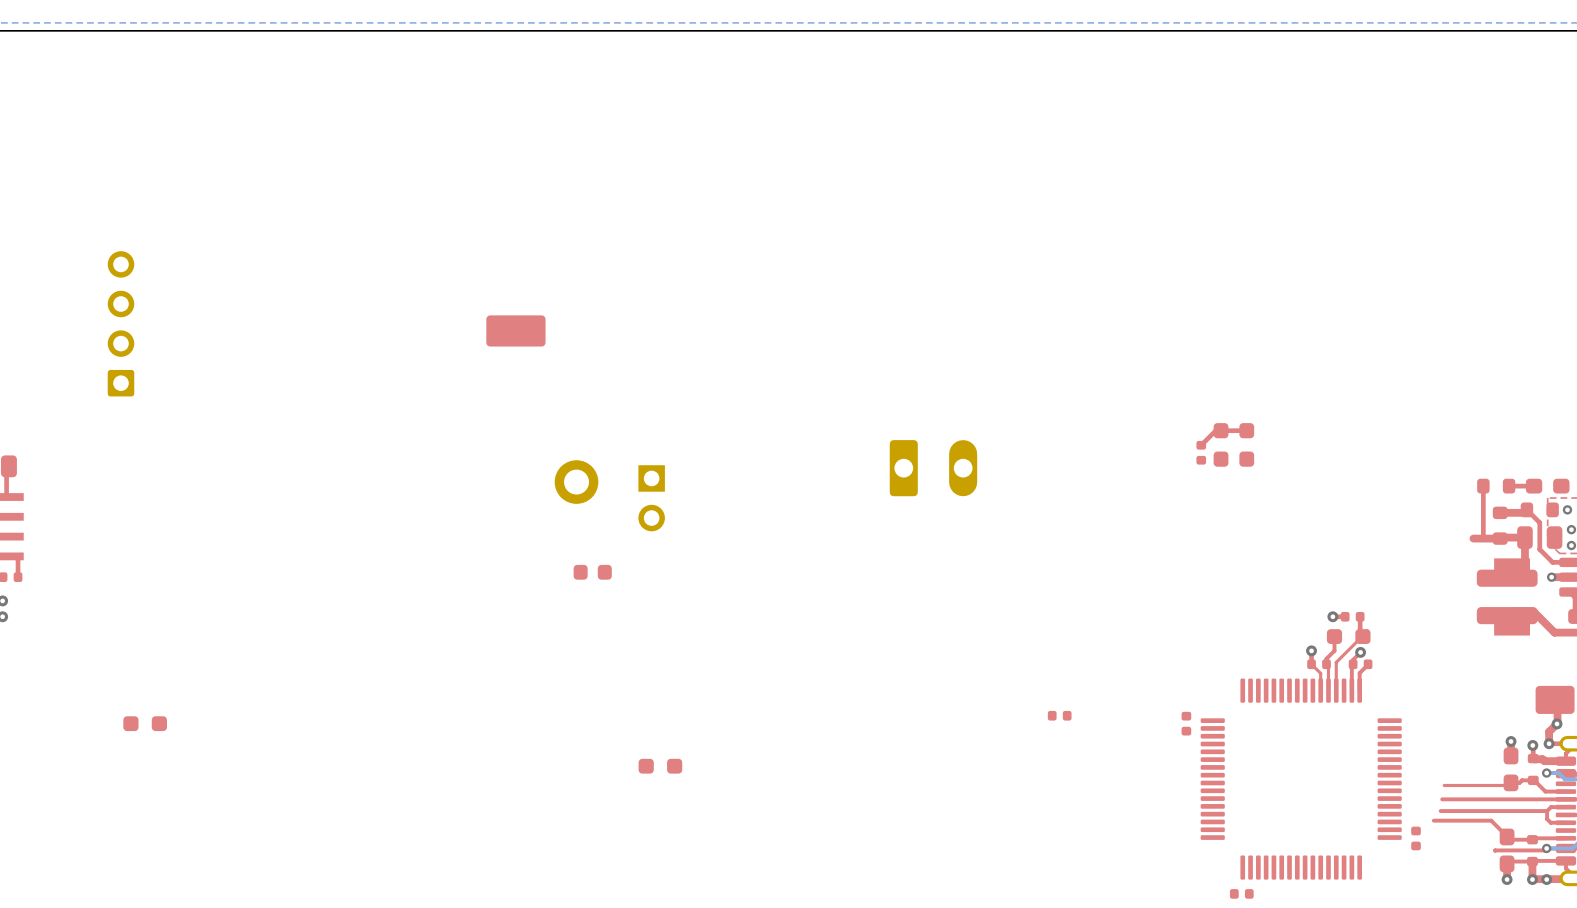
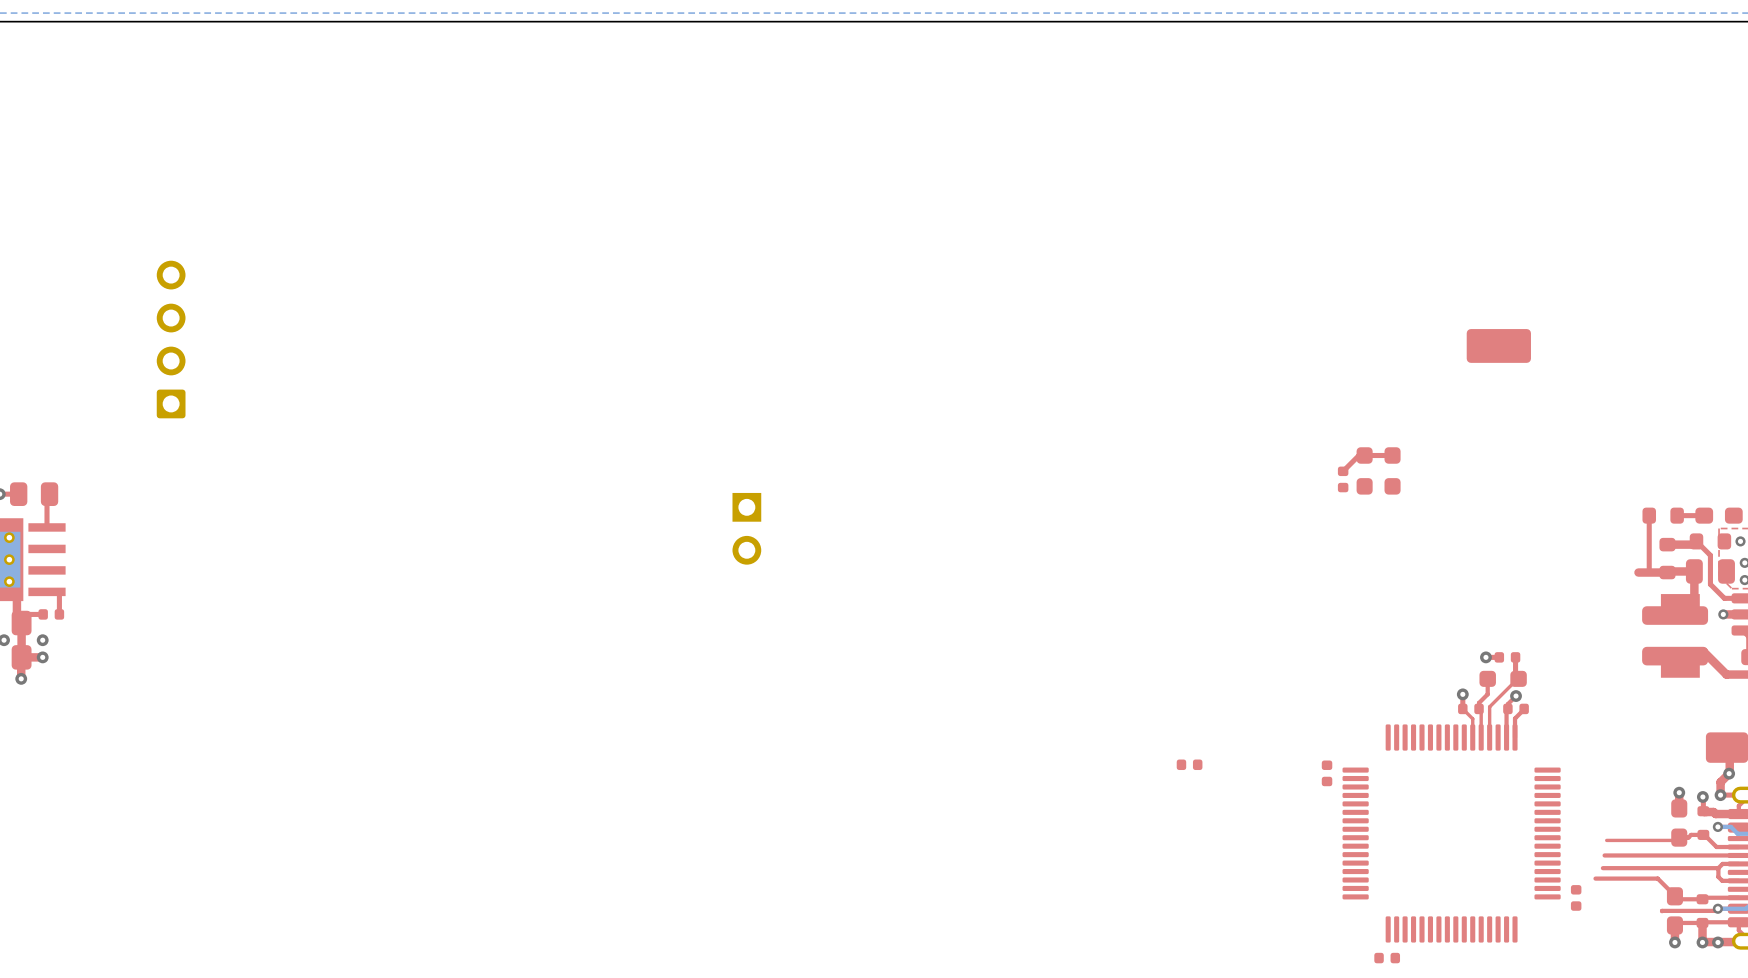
part: none -> (1498, 345)
part: (515, 330) -> none
part: (933, 468) -> none
part: (576, 482) -> none
part: (592, 572) -> none
part: (145, 723) -> none
part: (660, 766) -> none

